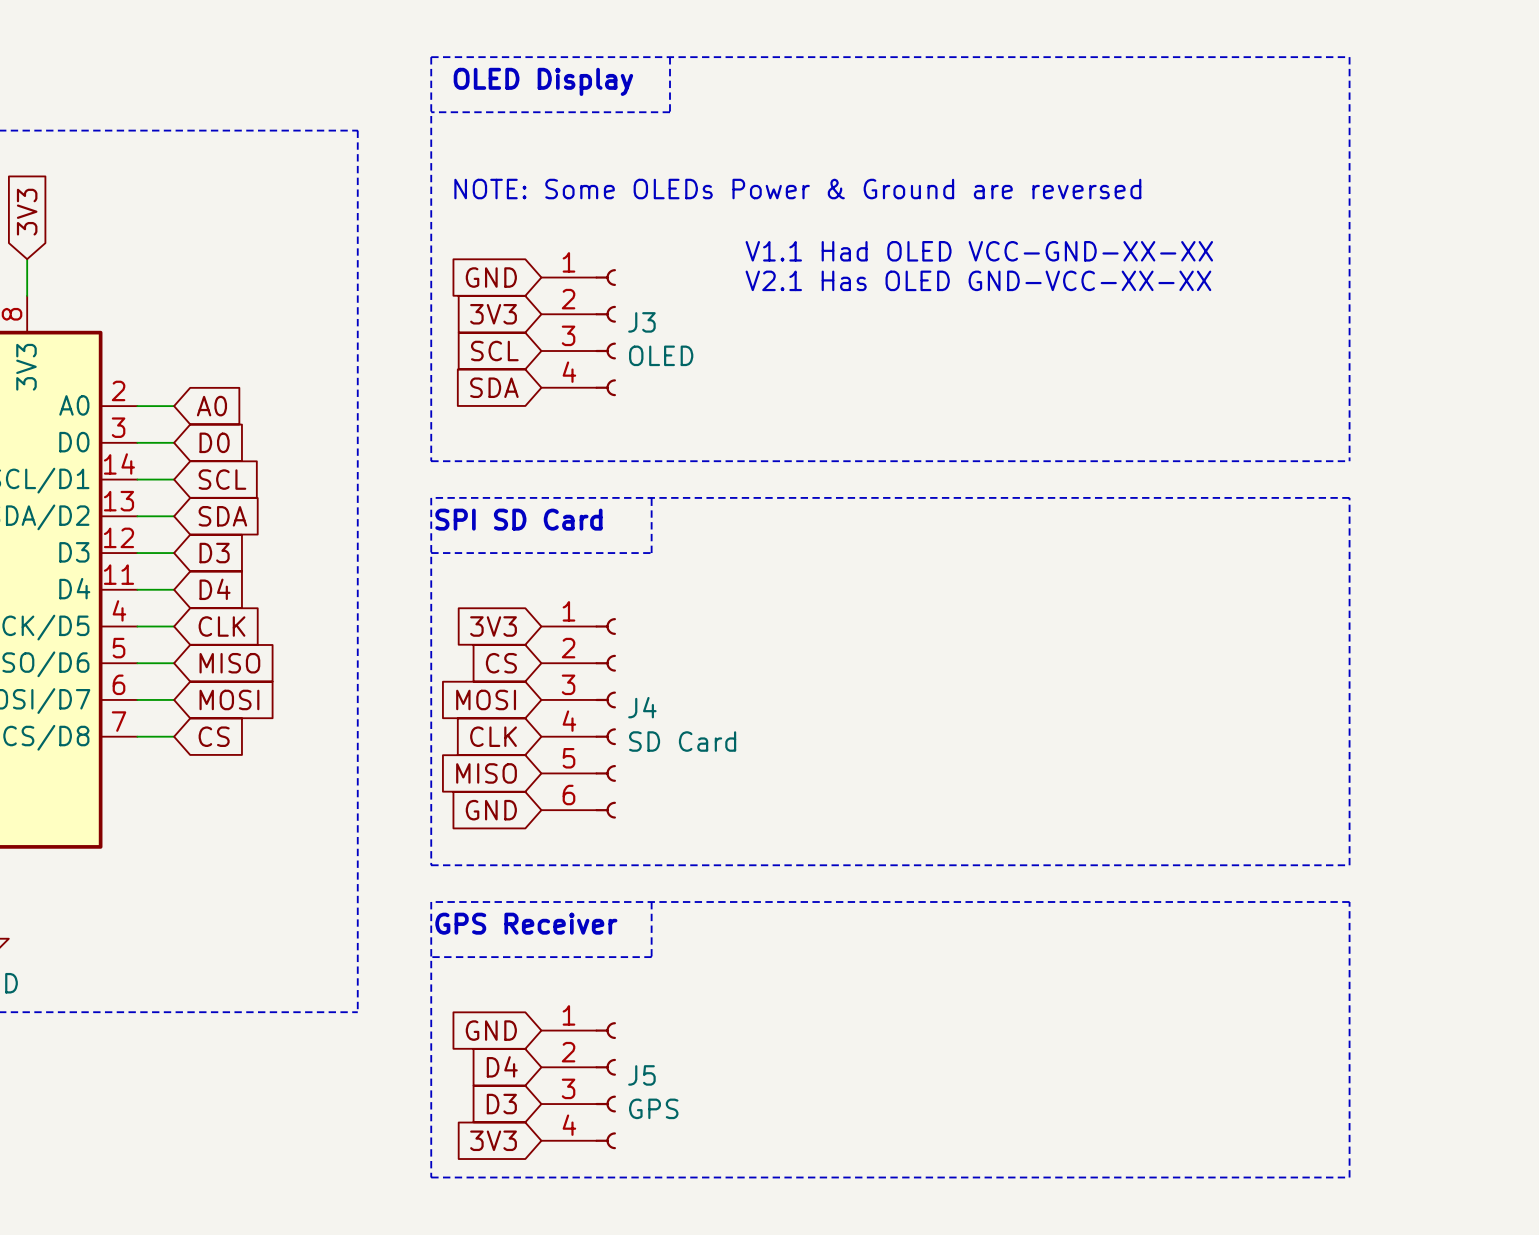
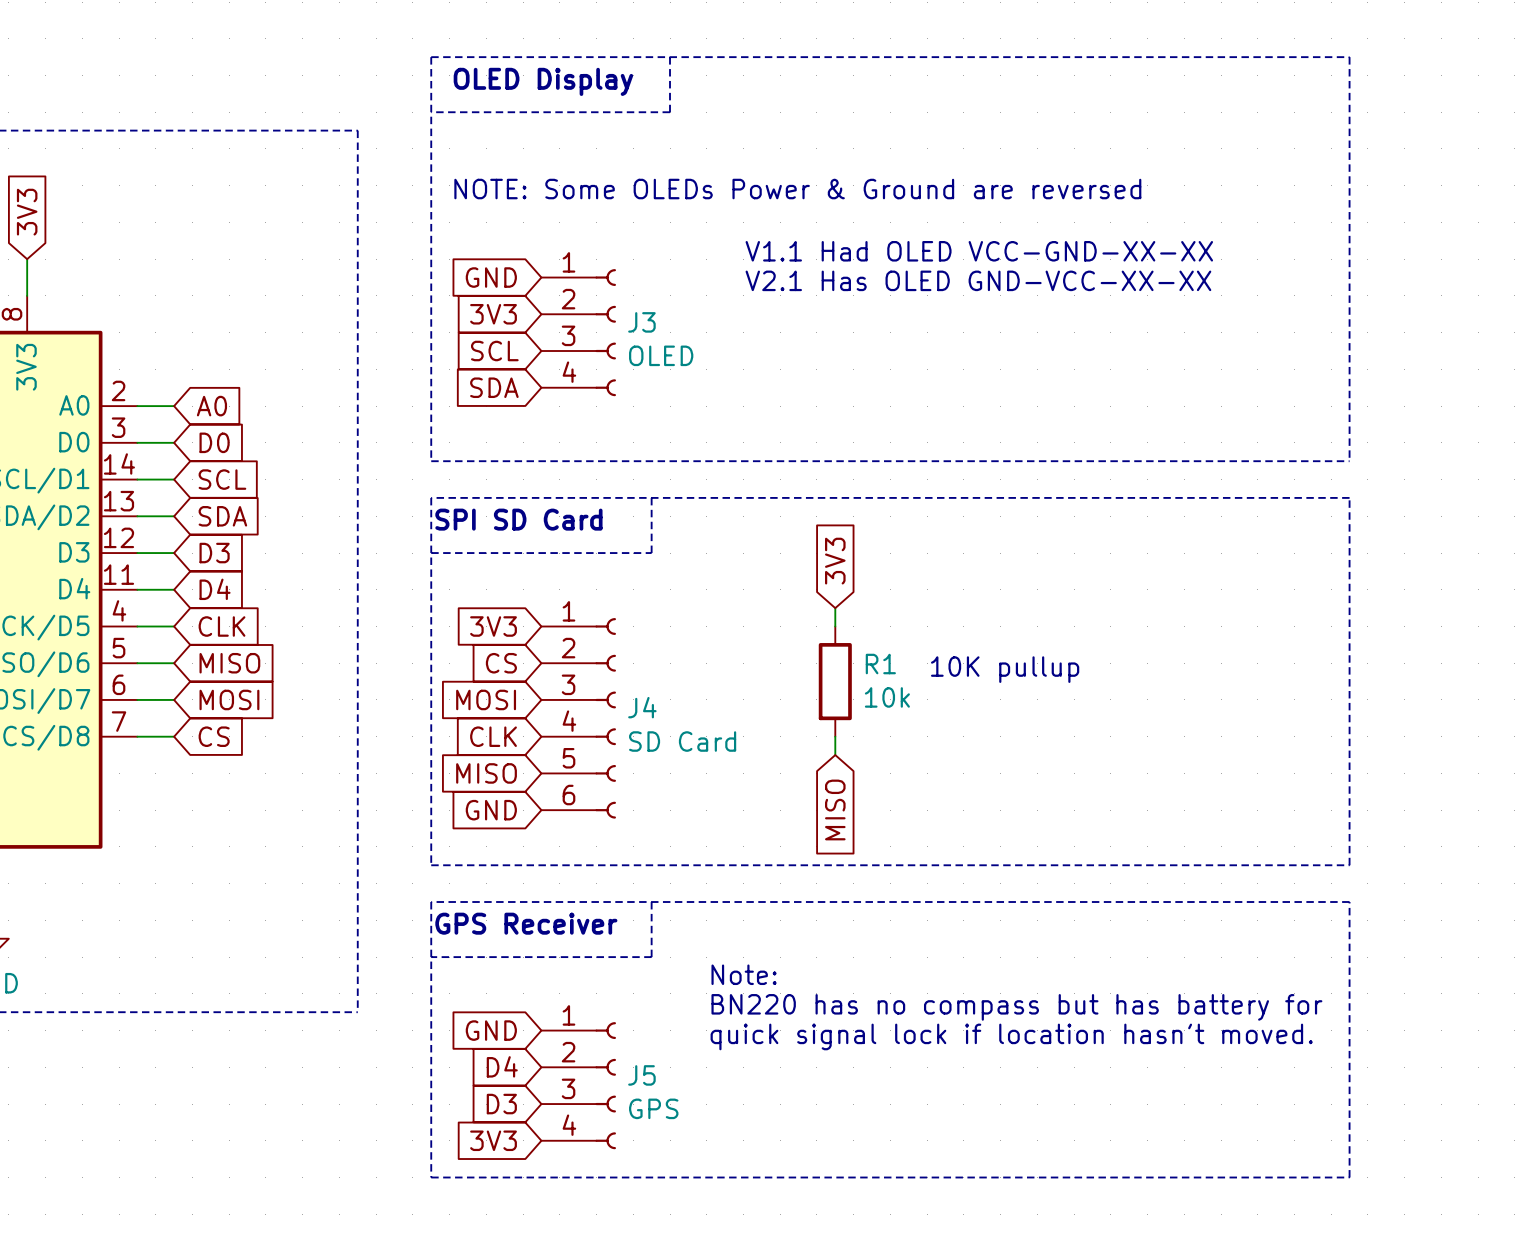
global label: none -> 3V3 (835, 561)
wire: none -> (835, 608) (835, 626)
text: none -> 10K pullup (1005, 669)
R1: none -> 10k (835, 681)
wire: none -> (835, 736) (835, 755)
global label: none -> MISO (835, 809)
text: none -> Note: (744, 974)
text: none -> BN220 has no compass but has battery for (1016, 1007)
text: none -> quick signal lock if location hasn't moved. (1011, 1036)

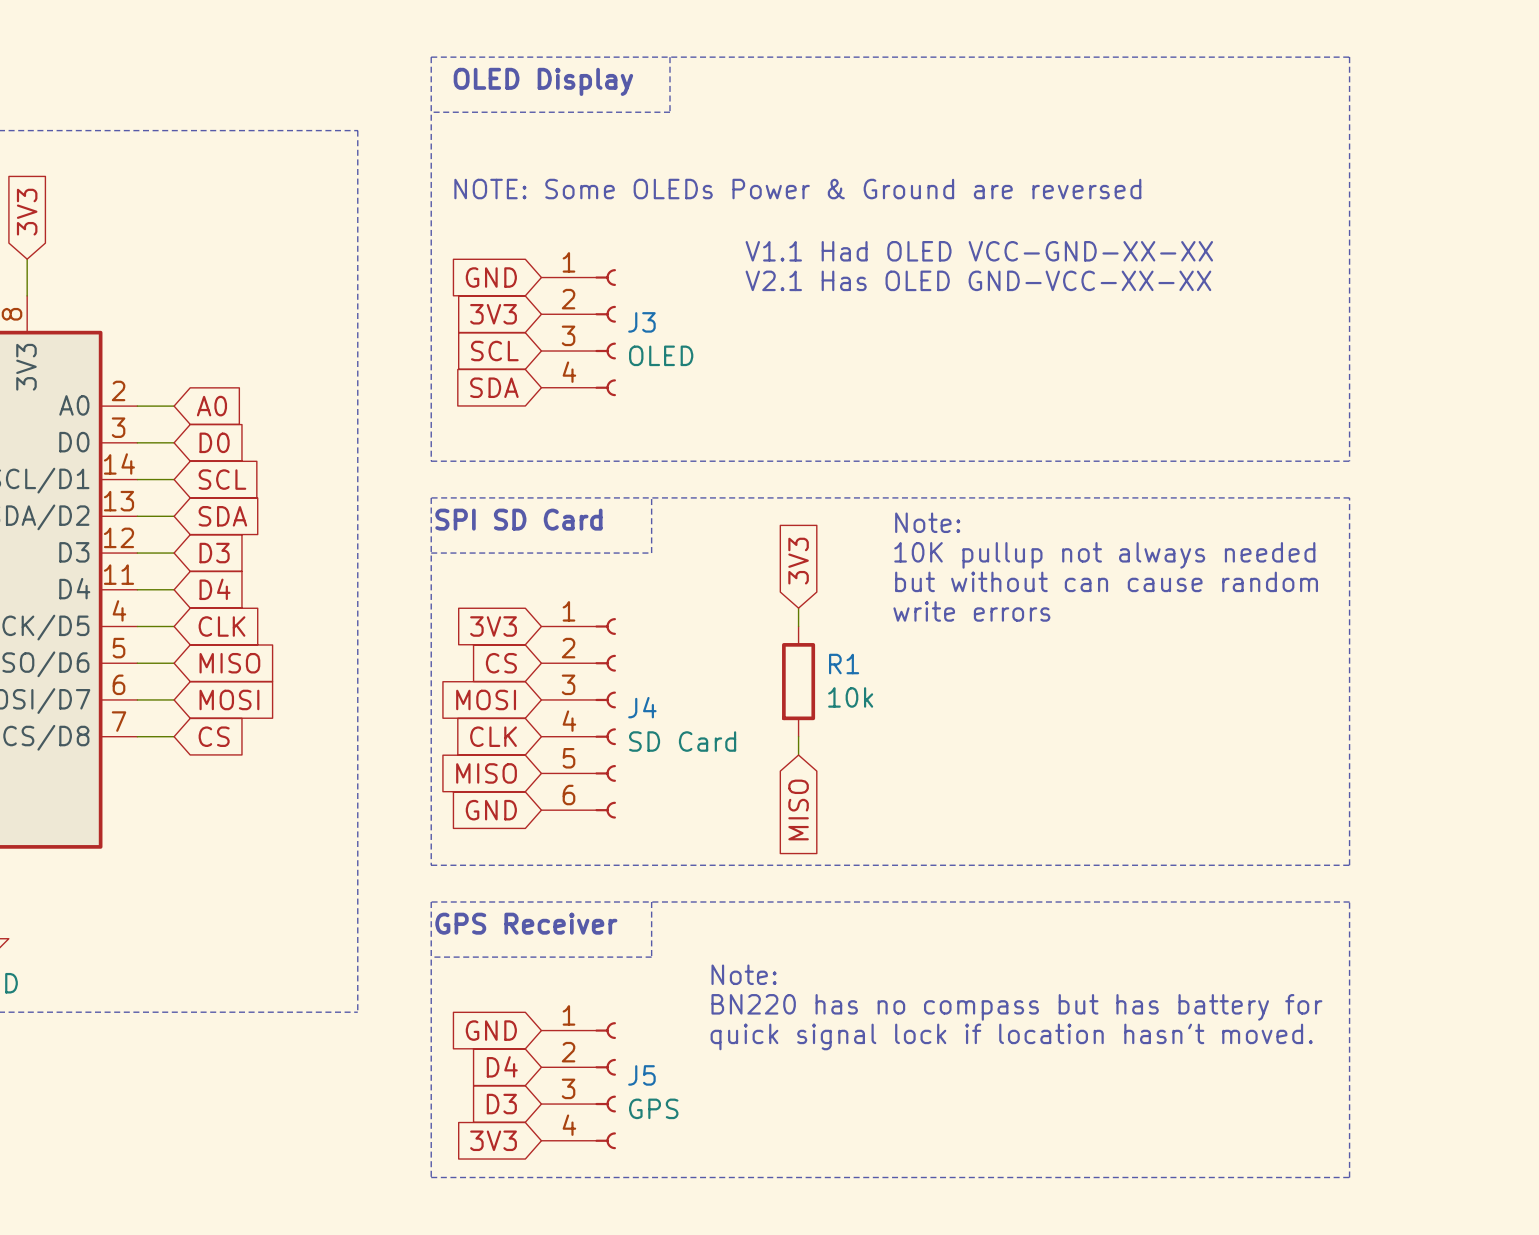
text: none -> Note: (927, 522)
text: none -> 10K pullup not always needed (1104, 555)
global label position: 3V3 (835, 561) -> 3V3 (798, 561)
text: none -> but without can cause random (1106, 581)
wire: (835, 608) (835, 626) -> (798, 608) (798, 626)
text: none -> write errors (971, 611)
text: 10K pullup (1005, 669) -> none
R1 position: (835, 681) -> (798, 681)
wire: (835, 736) (835, 755) -> (798, 736) (798, 755)
global label position: MISO (835, 809) -> MISO (798, 809)

